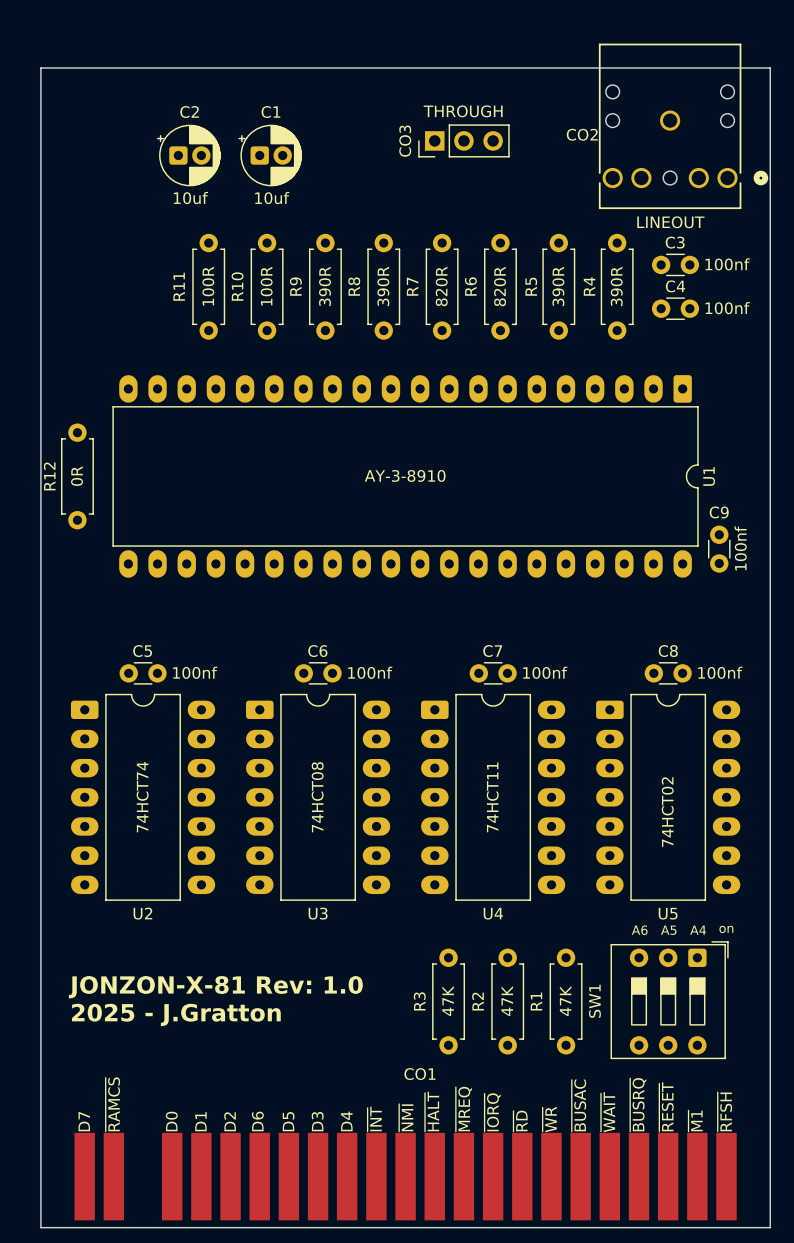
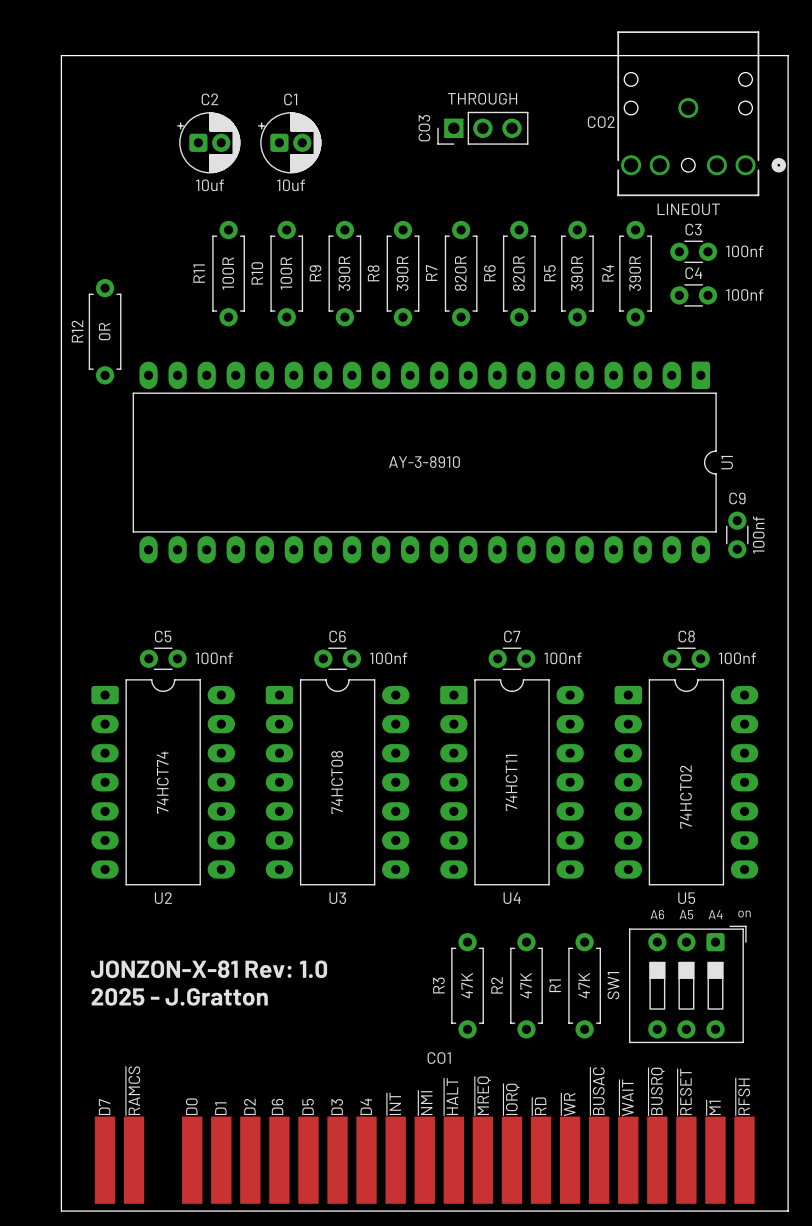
R12 position: (77, 476) -> (105, 331)

